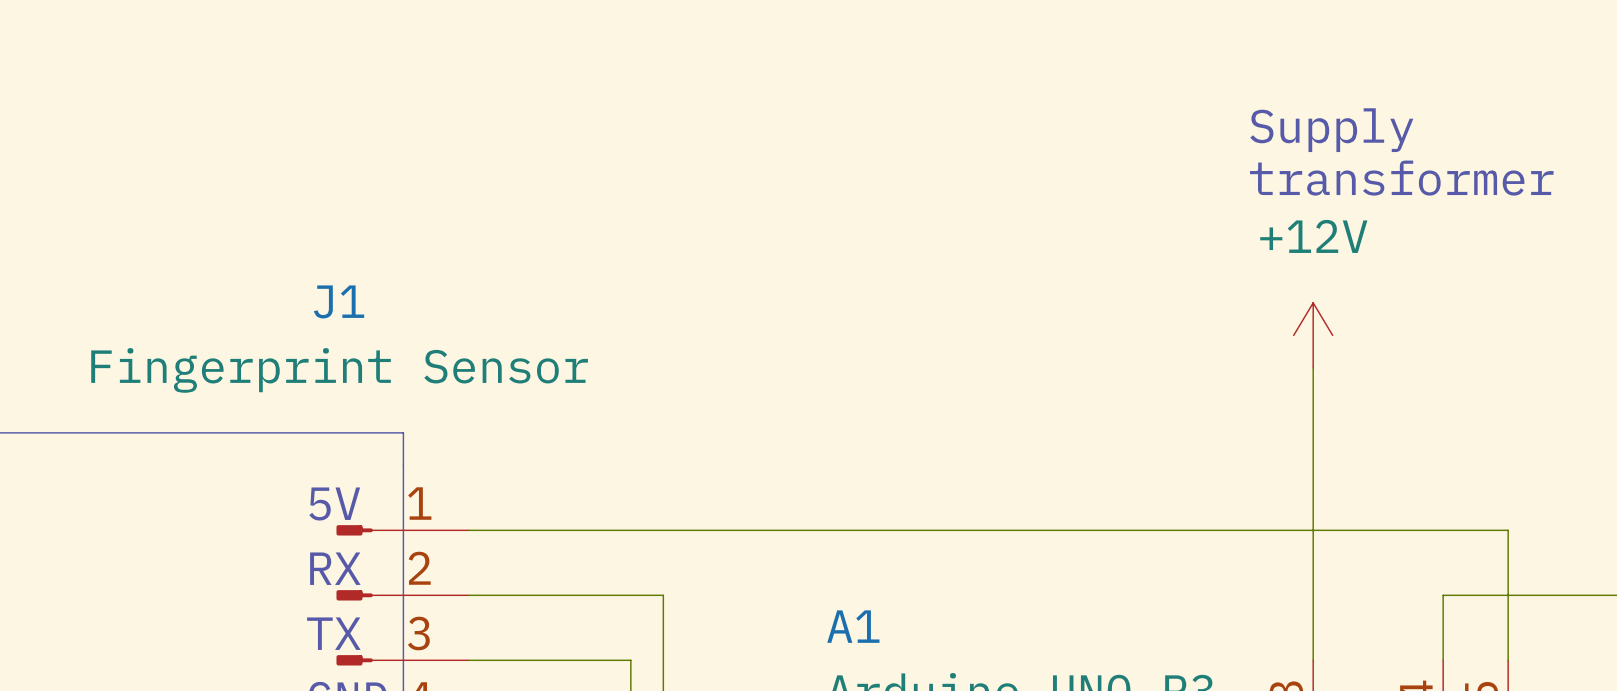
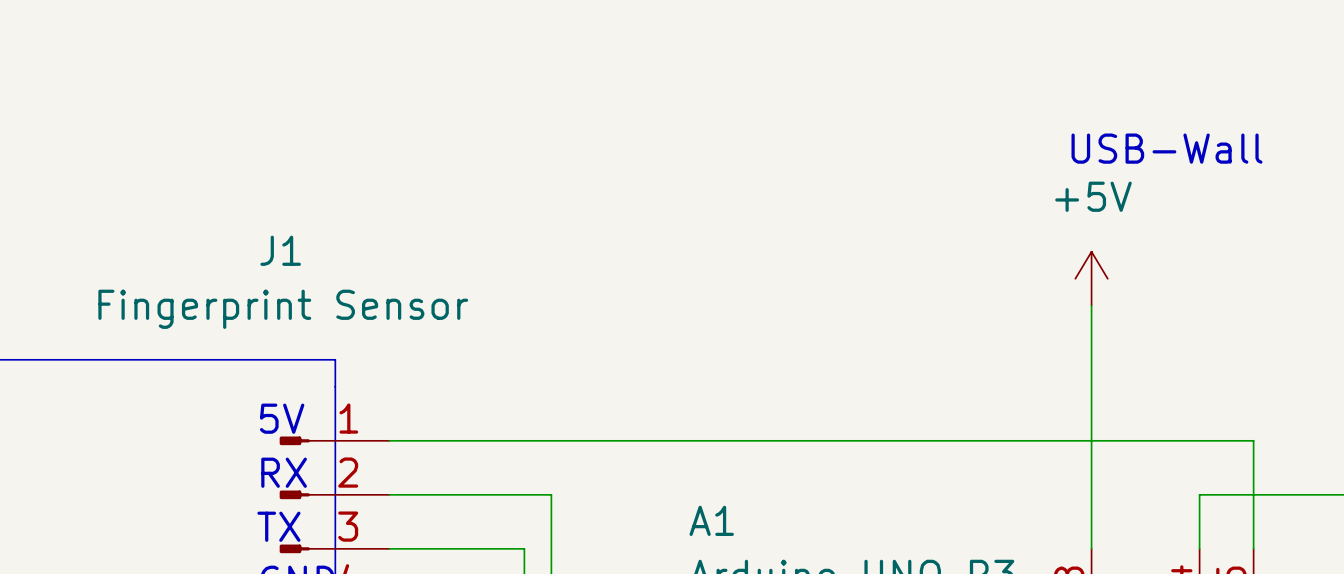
text: Supply (1331, 130) -> none
text: none -> USB-Wall (1167, 148)
text: transformer (1401, 178) -> none
power symbol: +12V (1313, 335) -> +5V (1091, 278)

